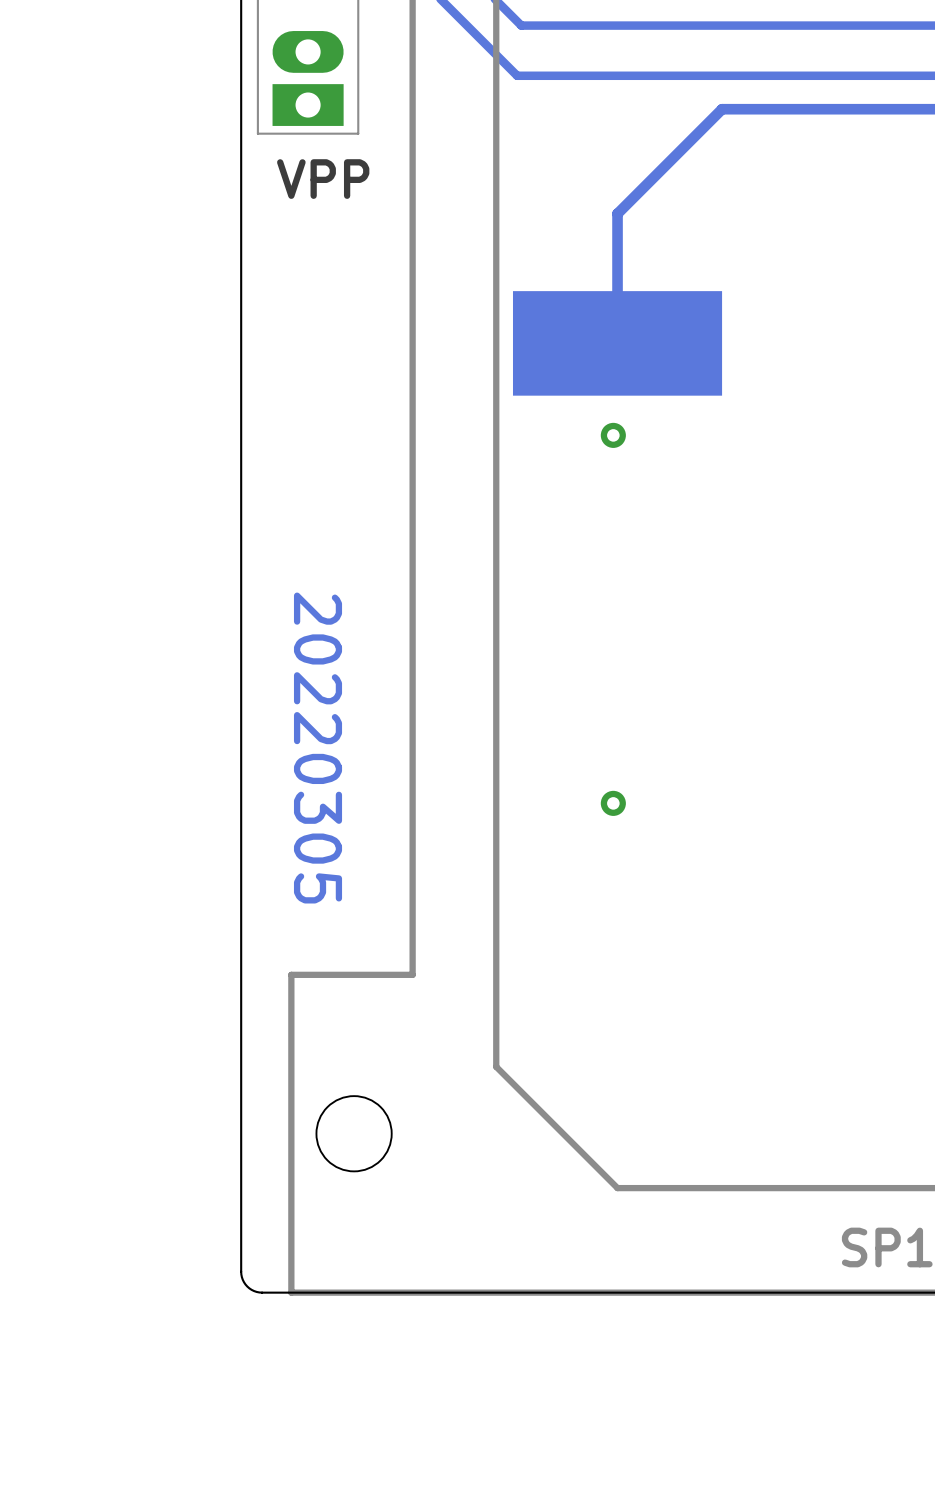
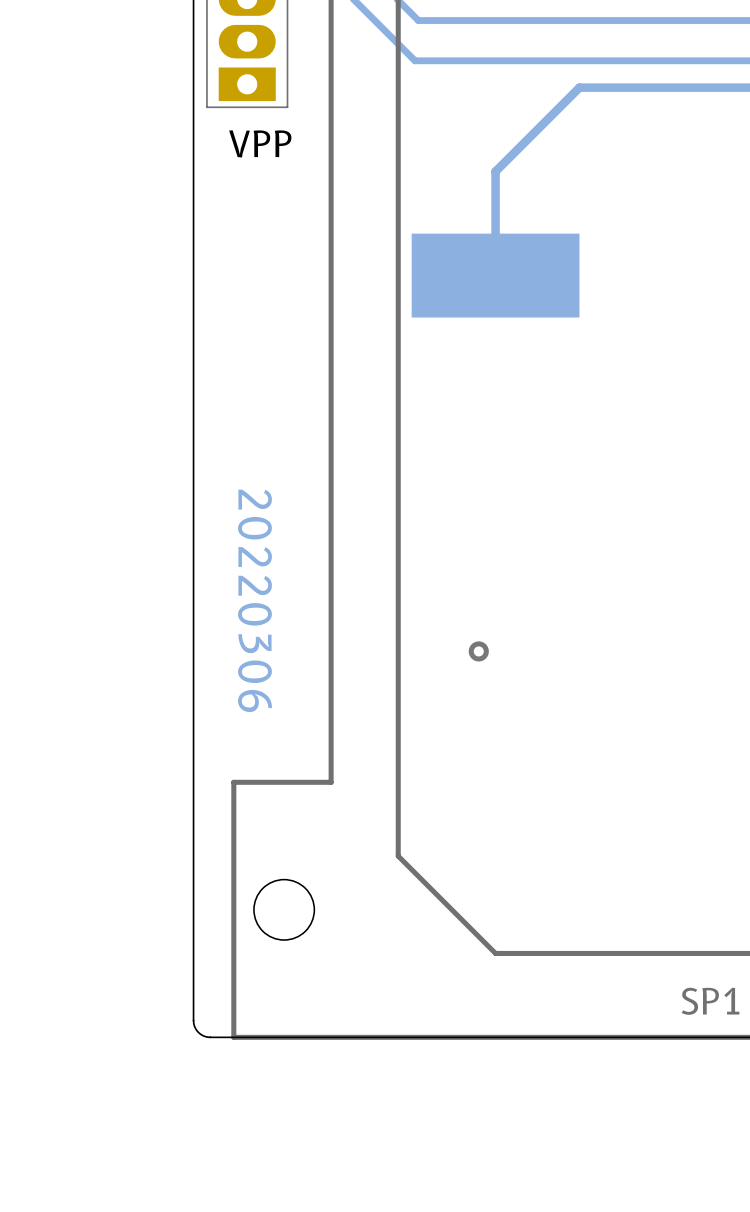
via: (613, 435) -> none
text: 20220305 (318, 748) -> 20220306 (254, 600)
via position: (613, 803) -> (478, 651)

